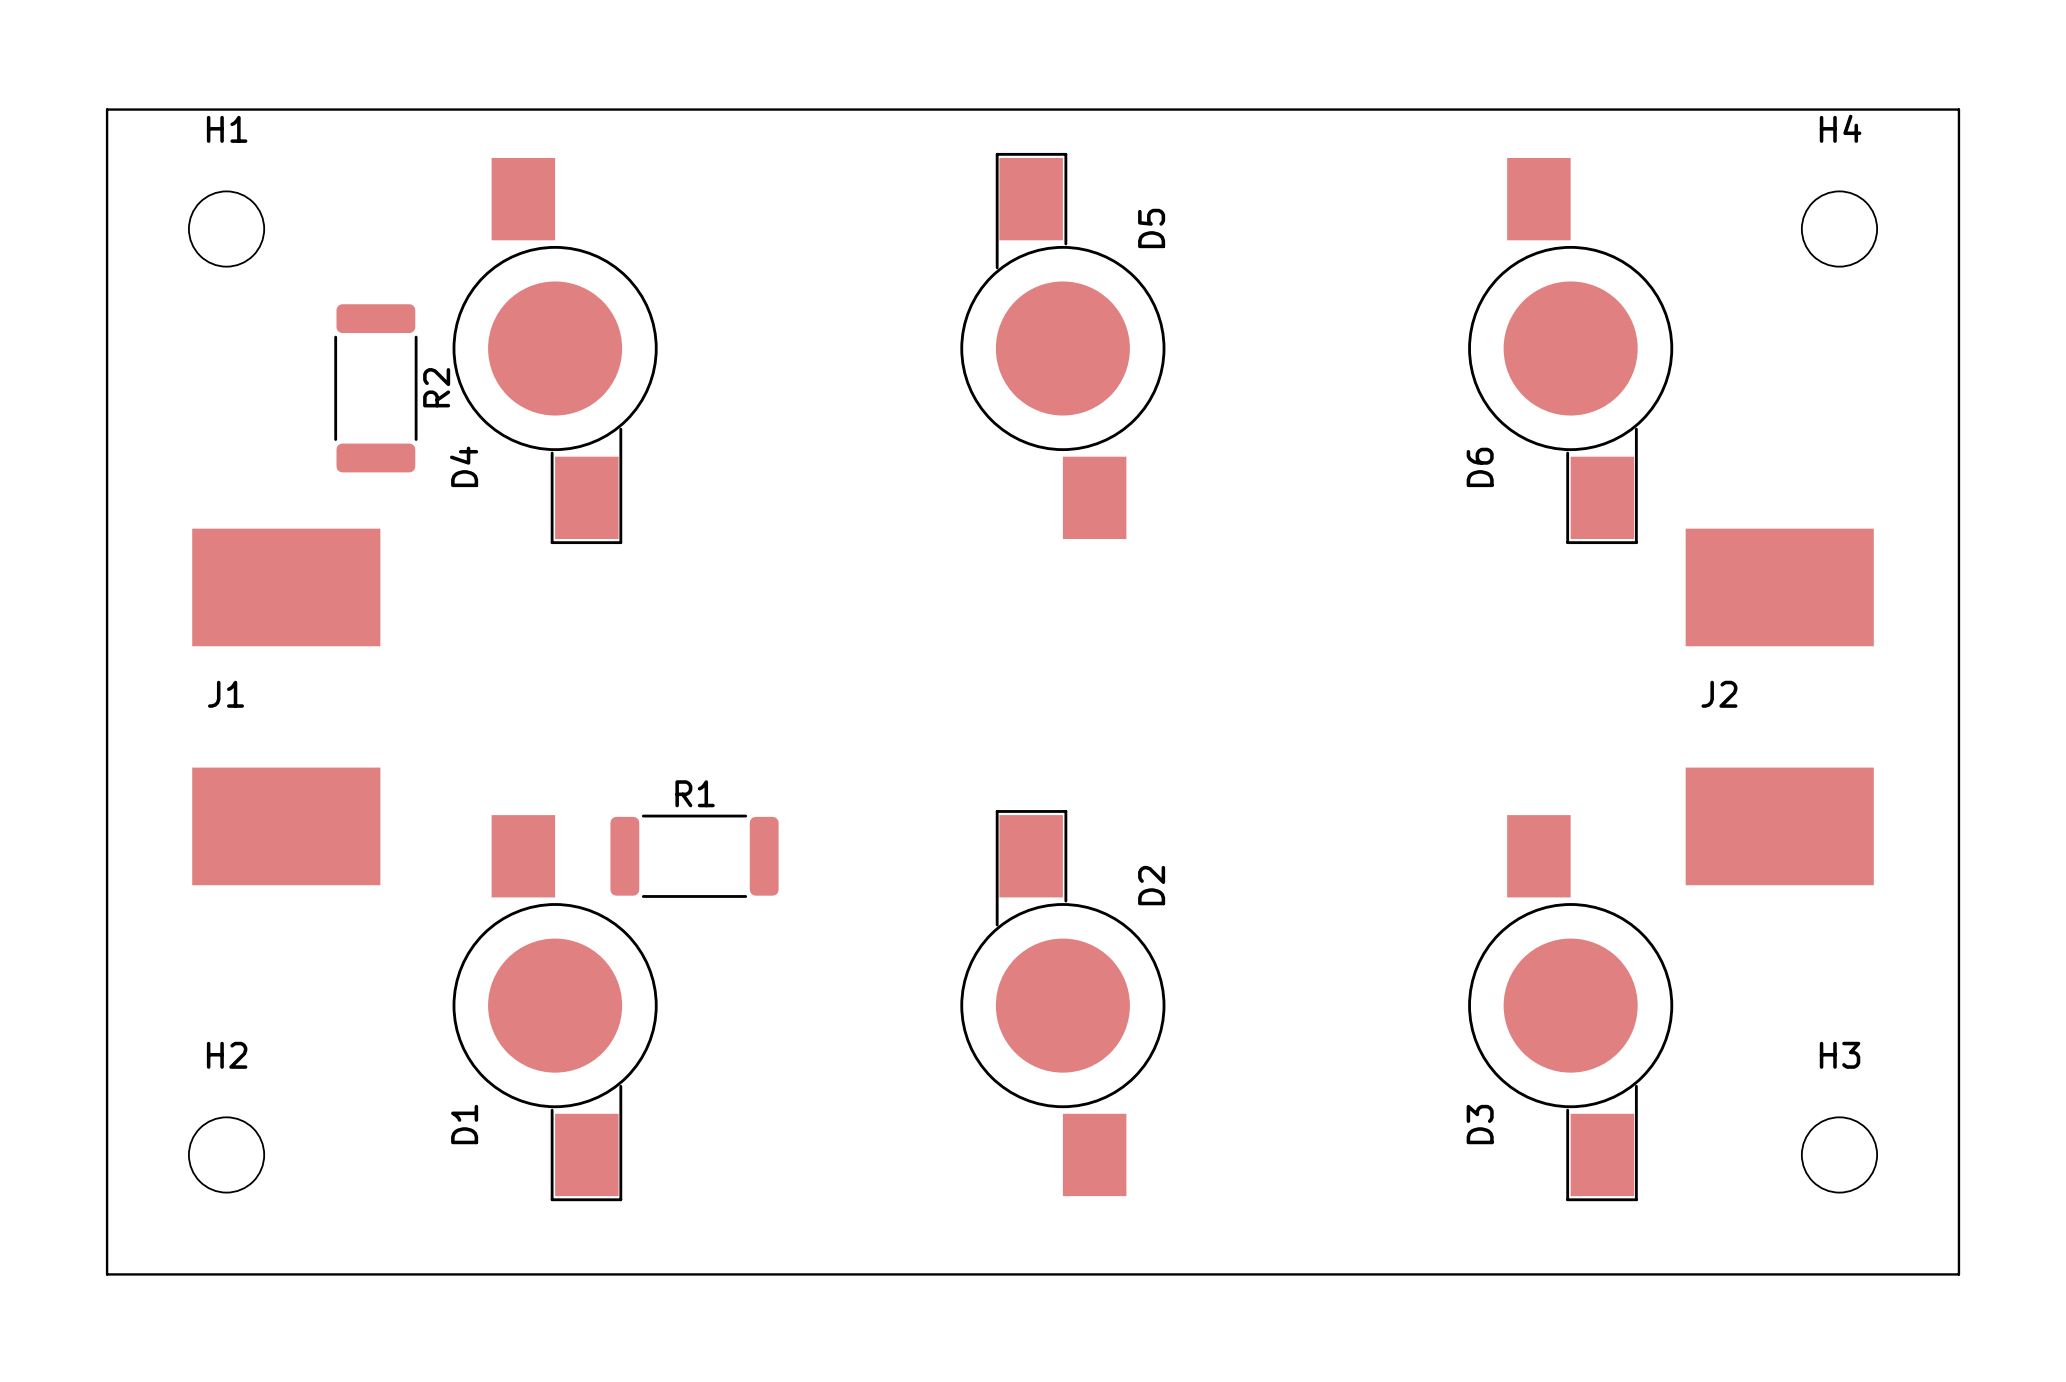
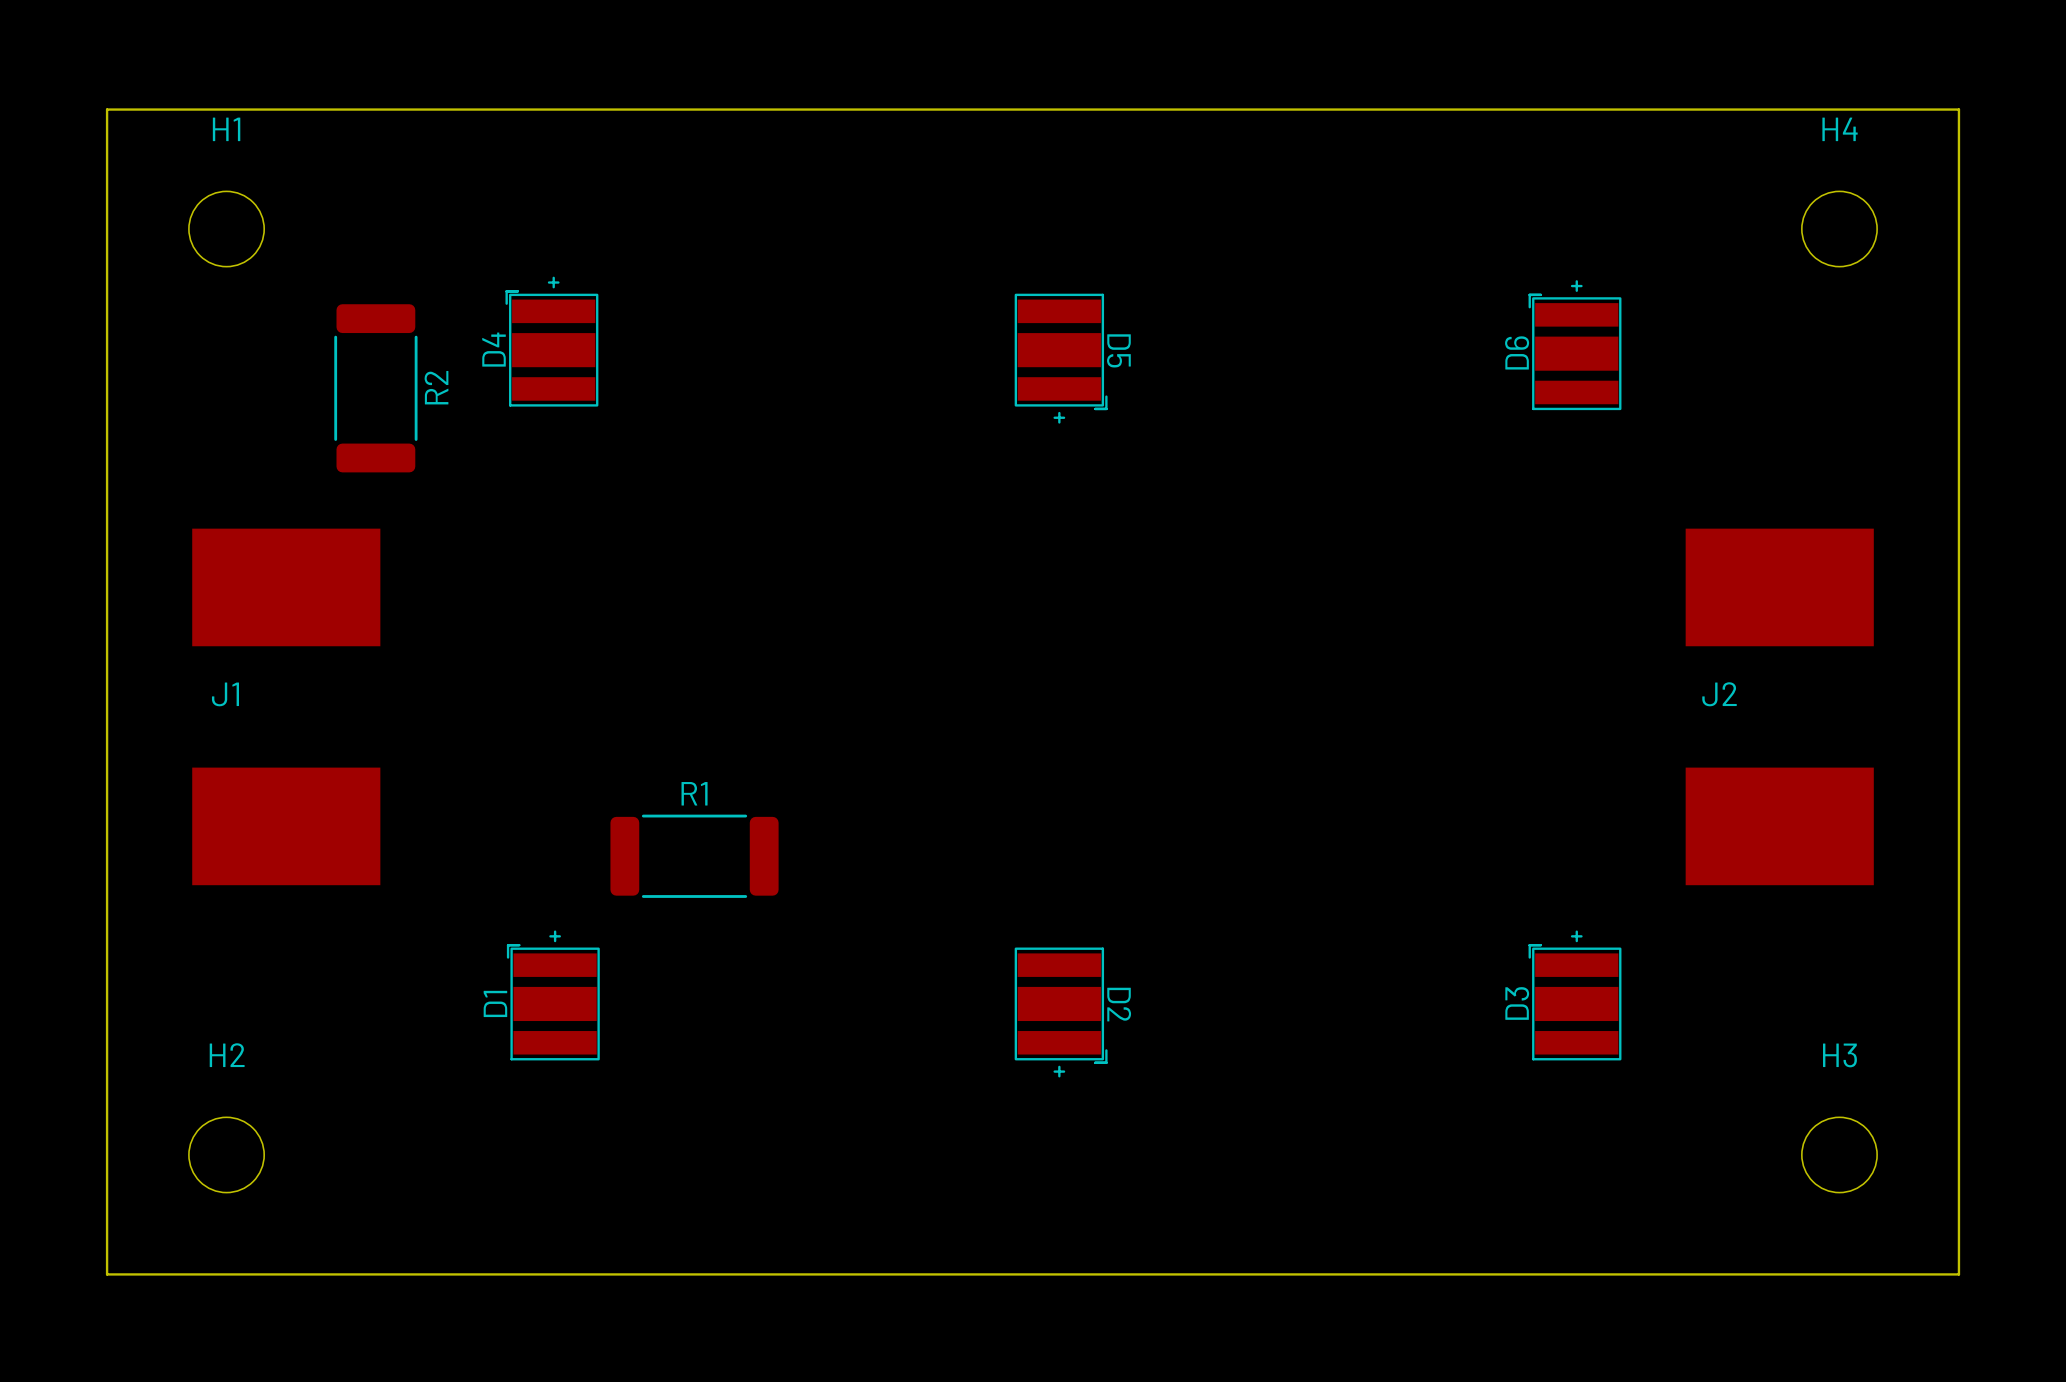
D5 footprint: [960, 152, 1166, 540] -> [1014, 293, 1108, 424]
D4 footprint: [452, 157, 658, 545] -> [505, 276, 599, 407]
D6 footprint: [1468, 157, 1674, 545] -> [1528, 280, 1622, 411]
D5 name position: D5 (1151, 228) -> D5 (1118, 350)
D4 name position: D4 (464, 466) -> D4 (494, 349)
D6 name position: D6 (1480, 467) -> D6 (1517, 352)
D2 footprint: [960, 810, 1166, 1197] -> [1014, 947, 1108, 1078]
D1 footprint: [452, 815, 658, 1202] -> [506, 930, 600, 1061]
D3 footprint: [1468, 815, 1674, 1202] -> [1528, 930, 1622, 1061]
D2 name position: D2 (1151, 885) -> D2 (1119, 1004)
D1 name position: D1 (464, 1124) -> D1 (495, 1003)
D3 name position: D3 (1480, 1124) -> D3 (1517, 1003)

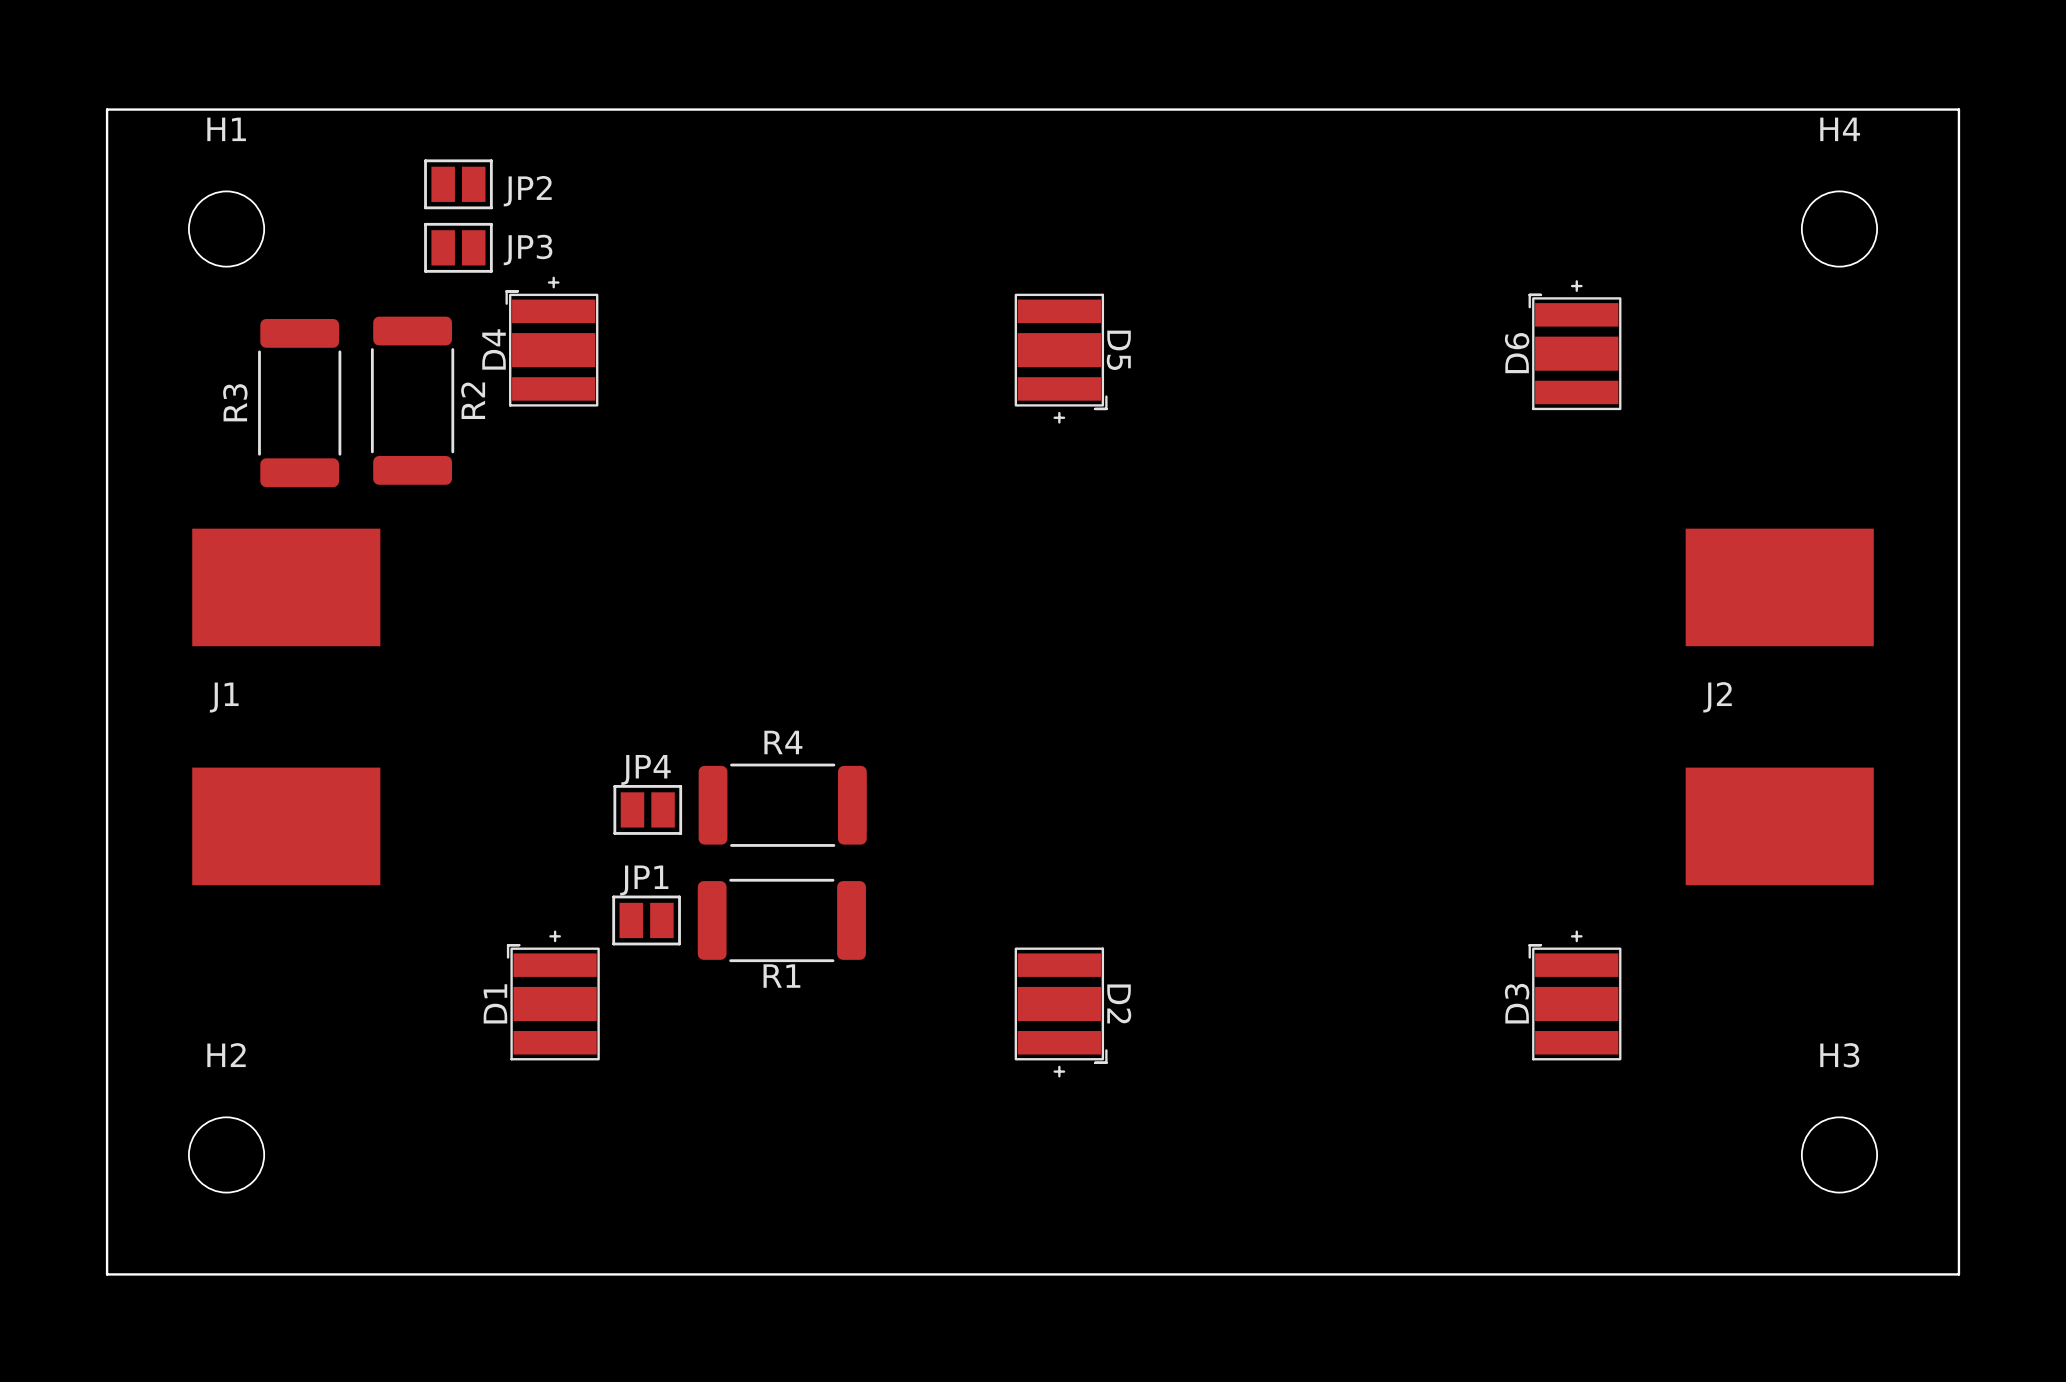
JP2: none -> (458, 184)
JP3: none -> (458, 247)
R2 position: (375, 388) -> (412, 400)
R3: none -> (299, 403)
R1 name position: R1 (694, 793) -> R1 (781, 976)
R4: none -> (782, 805)
JP4: none -> (647, 809)
R1 position: (694, 856) -> (781, 920)
JP1: none -> (646, 920)

